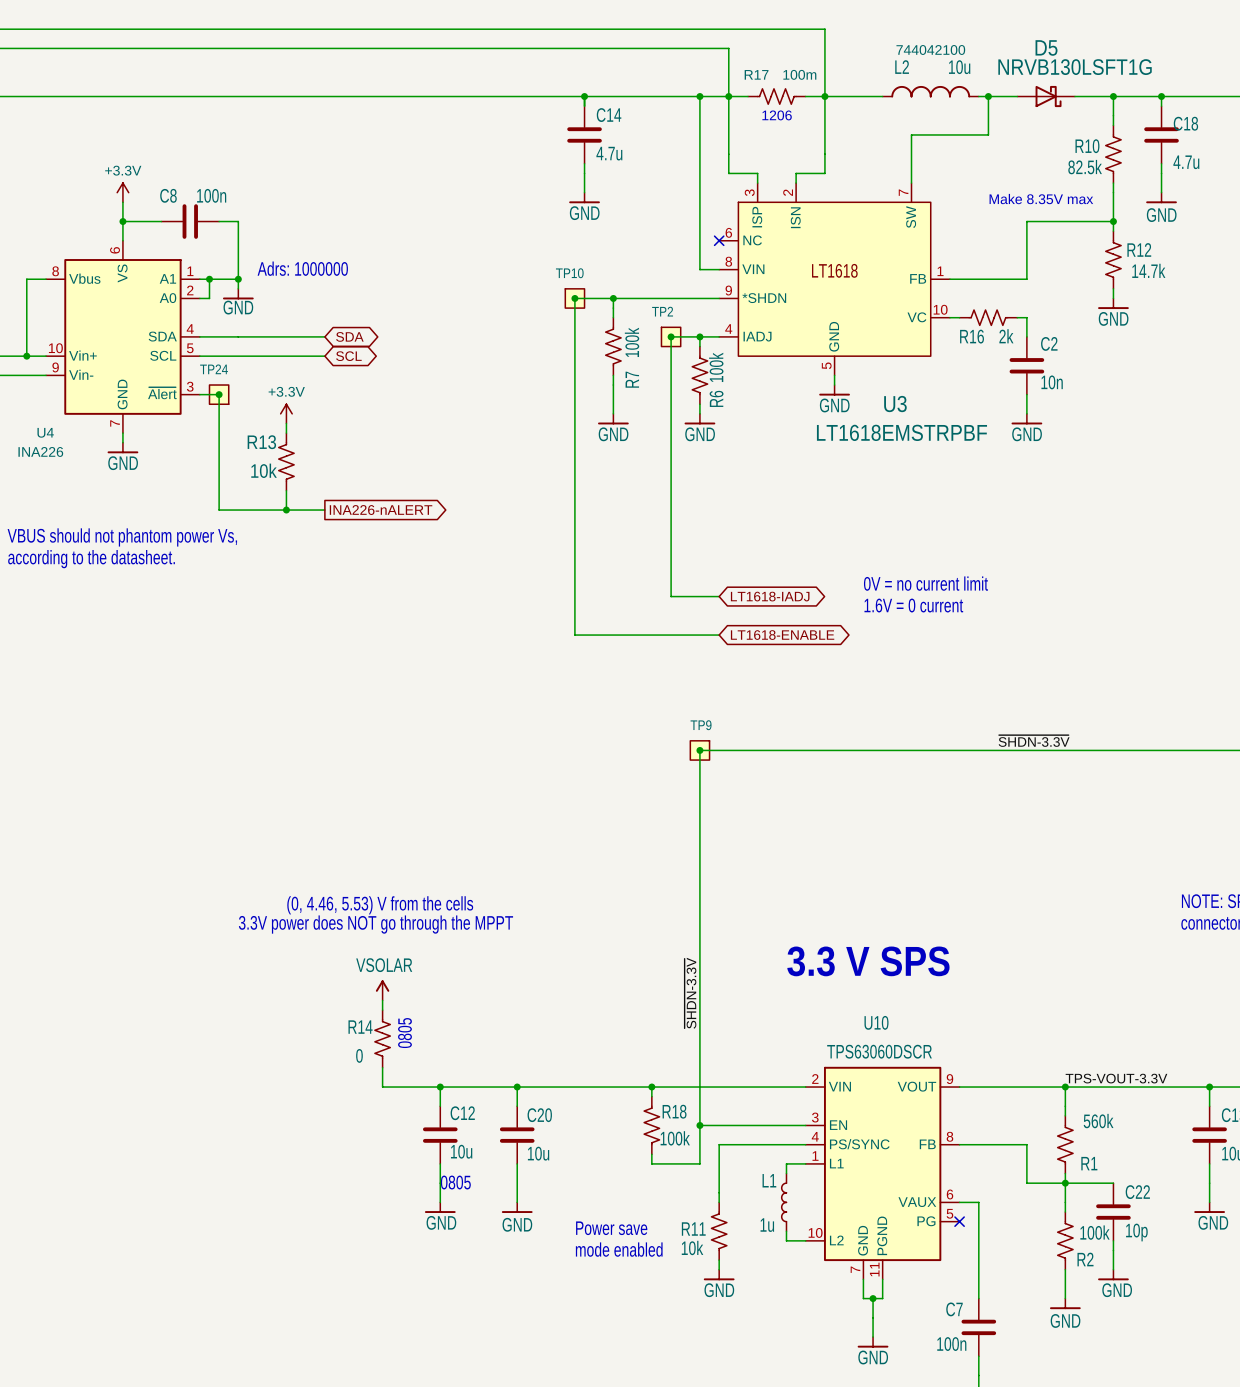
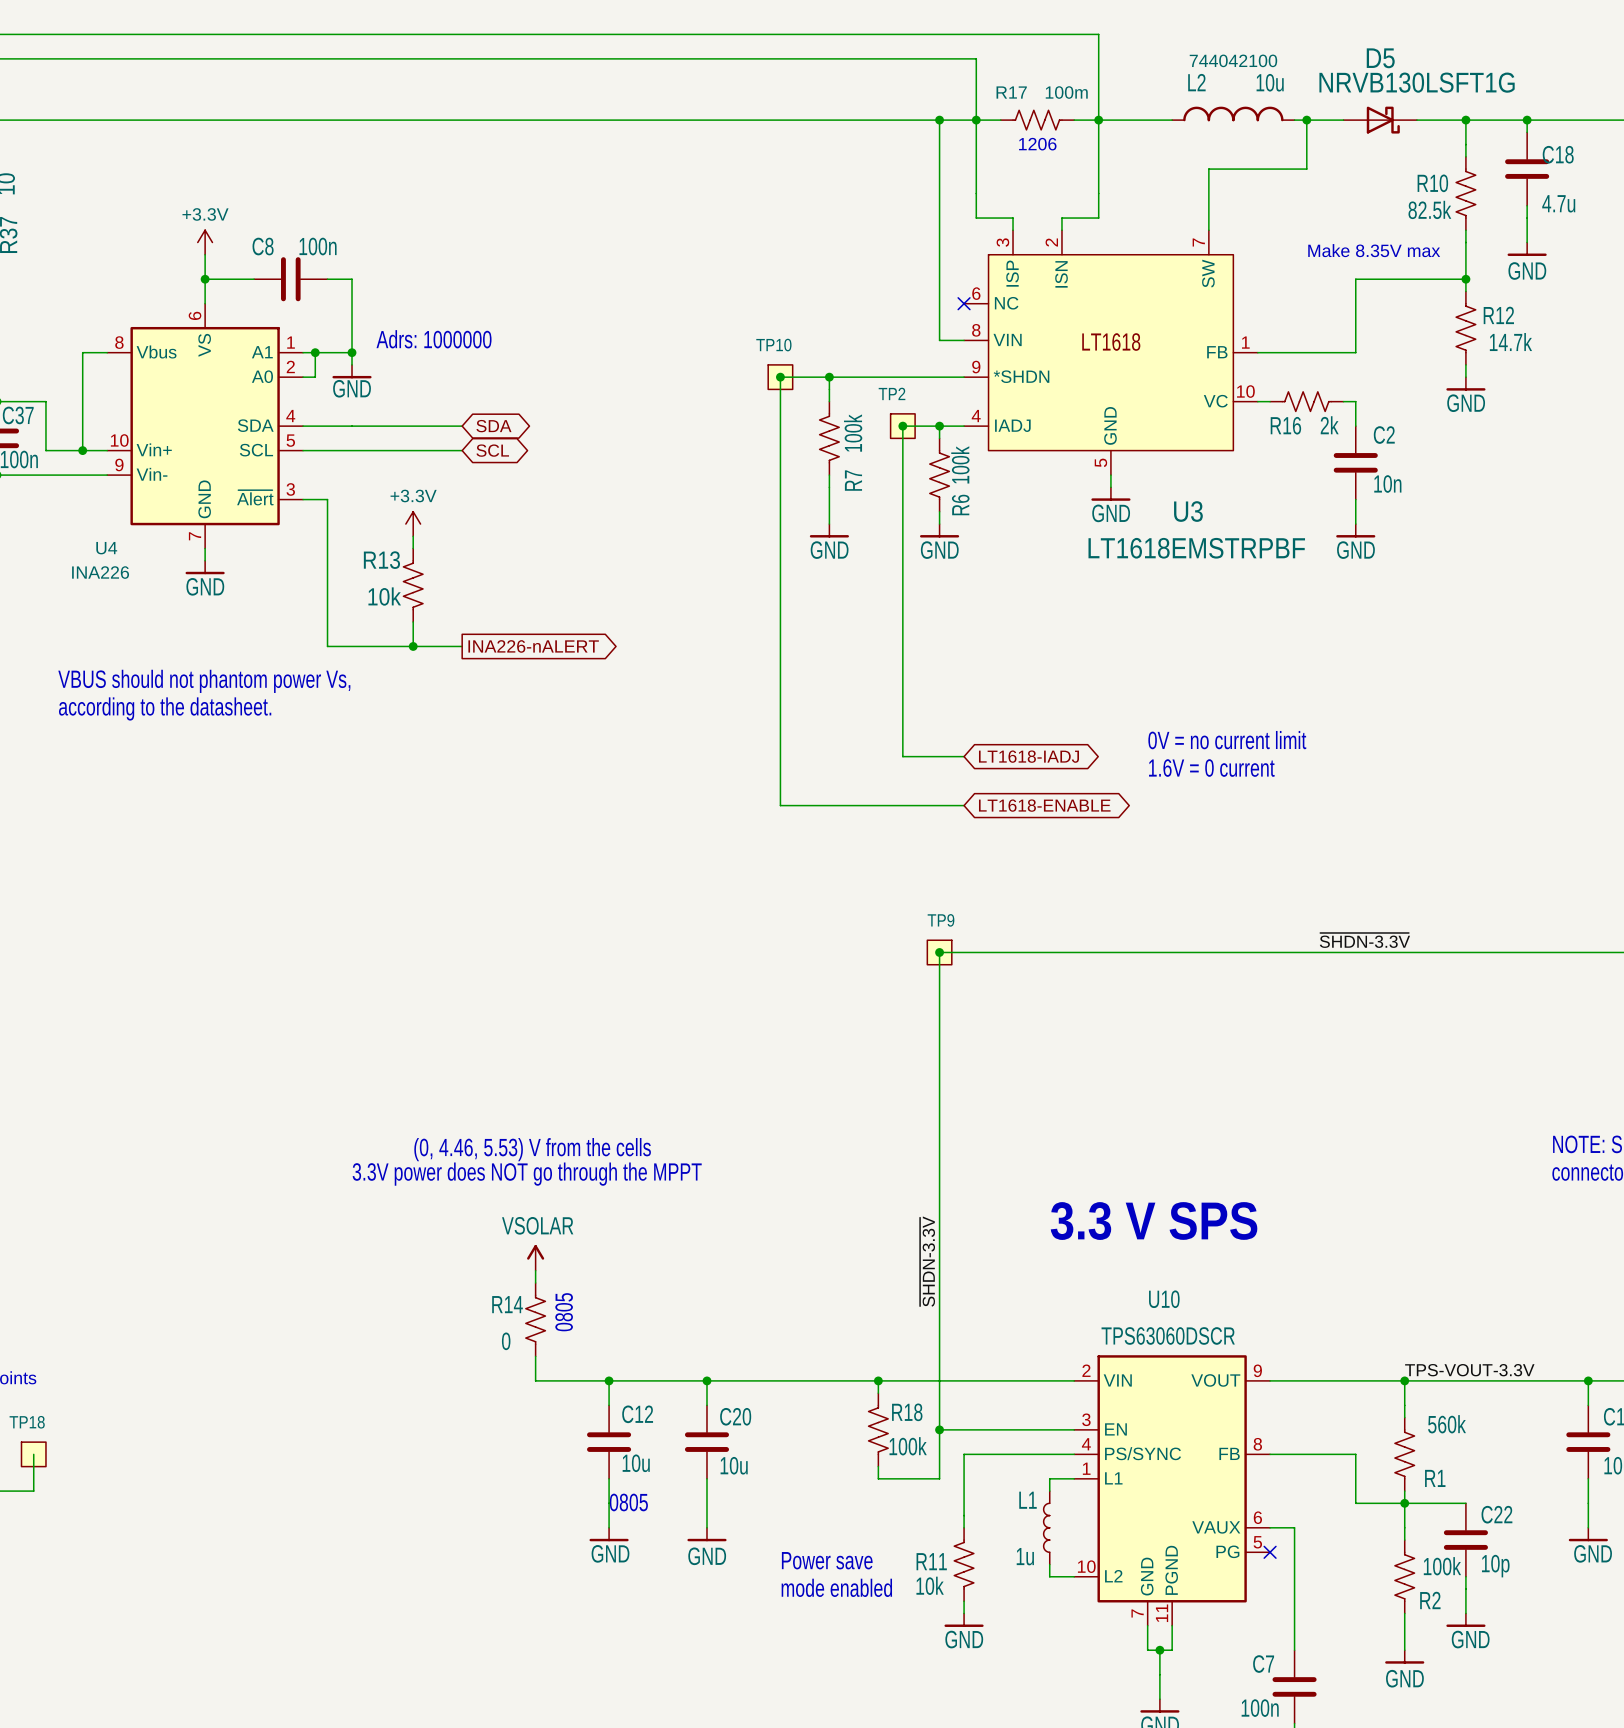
wire: (584, 96) (584, 106) -> none
junction: (584, 96) -> none
C14: 4.7u (584, 134) -> none
wire: (584, 163) (584, 192) -> none
power symbol: GND (584, 197) -> none
junction: (219, 394) -> none
TP24: (219, 394) -> none

